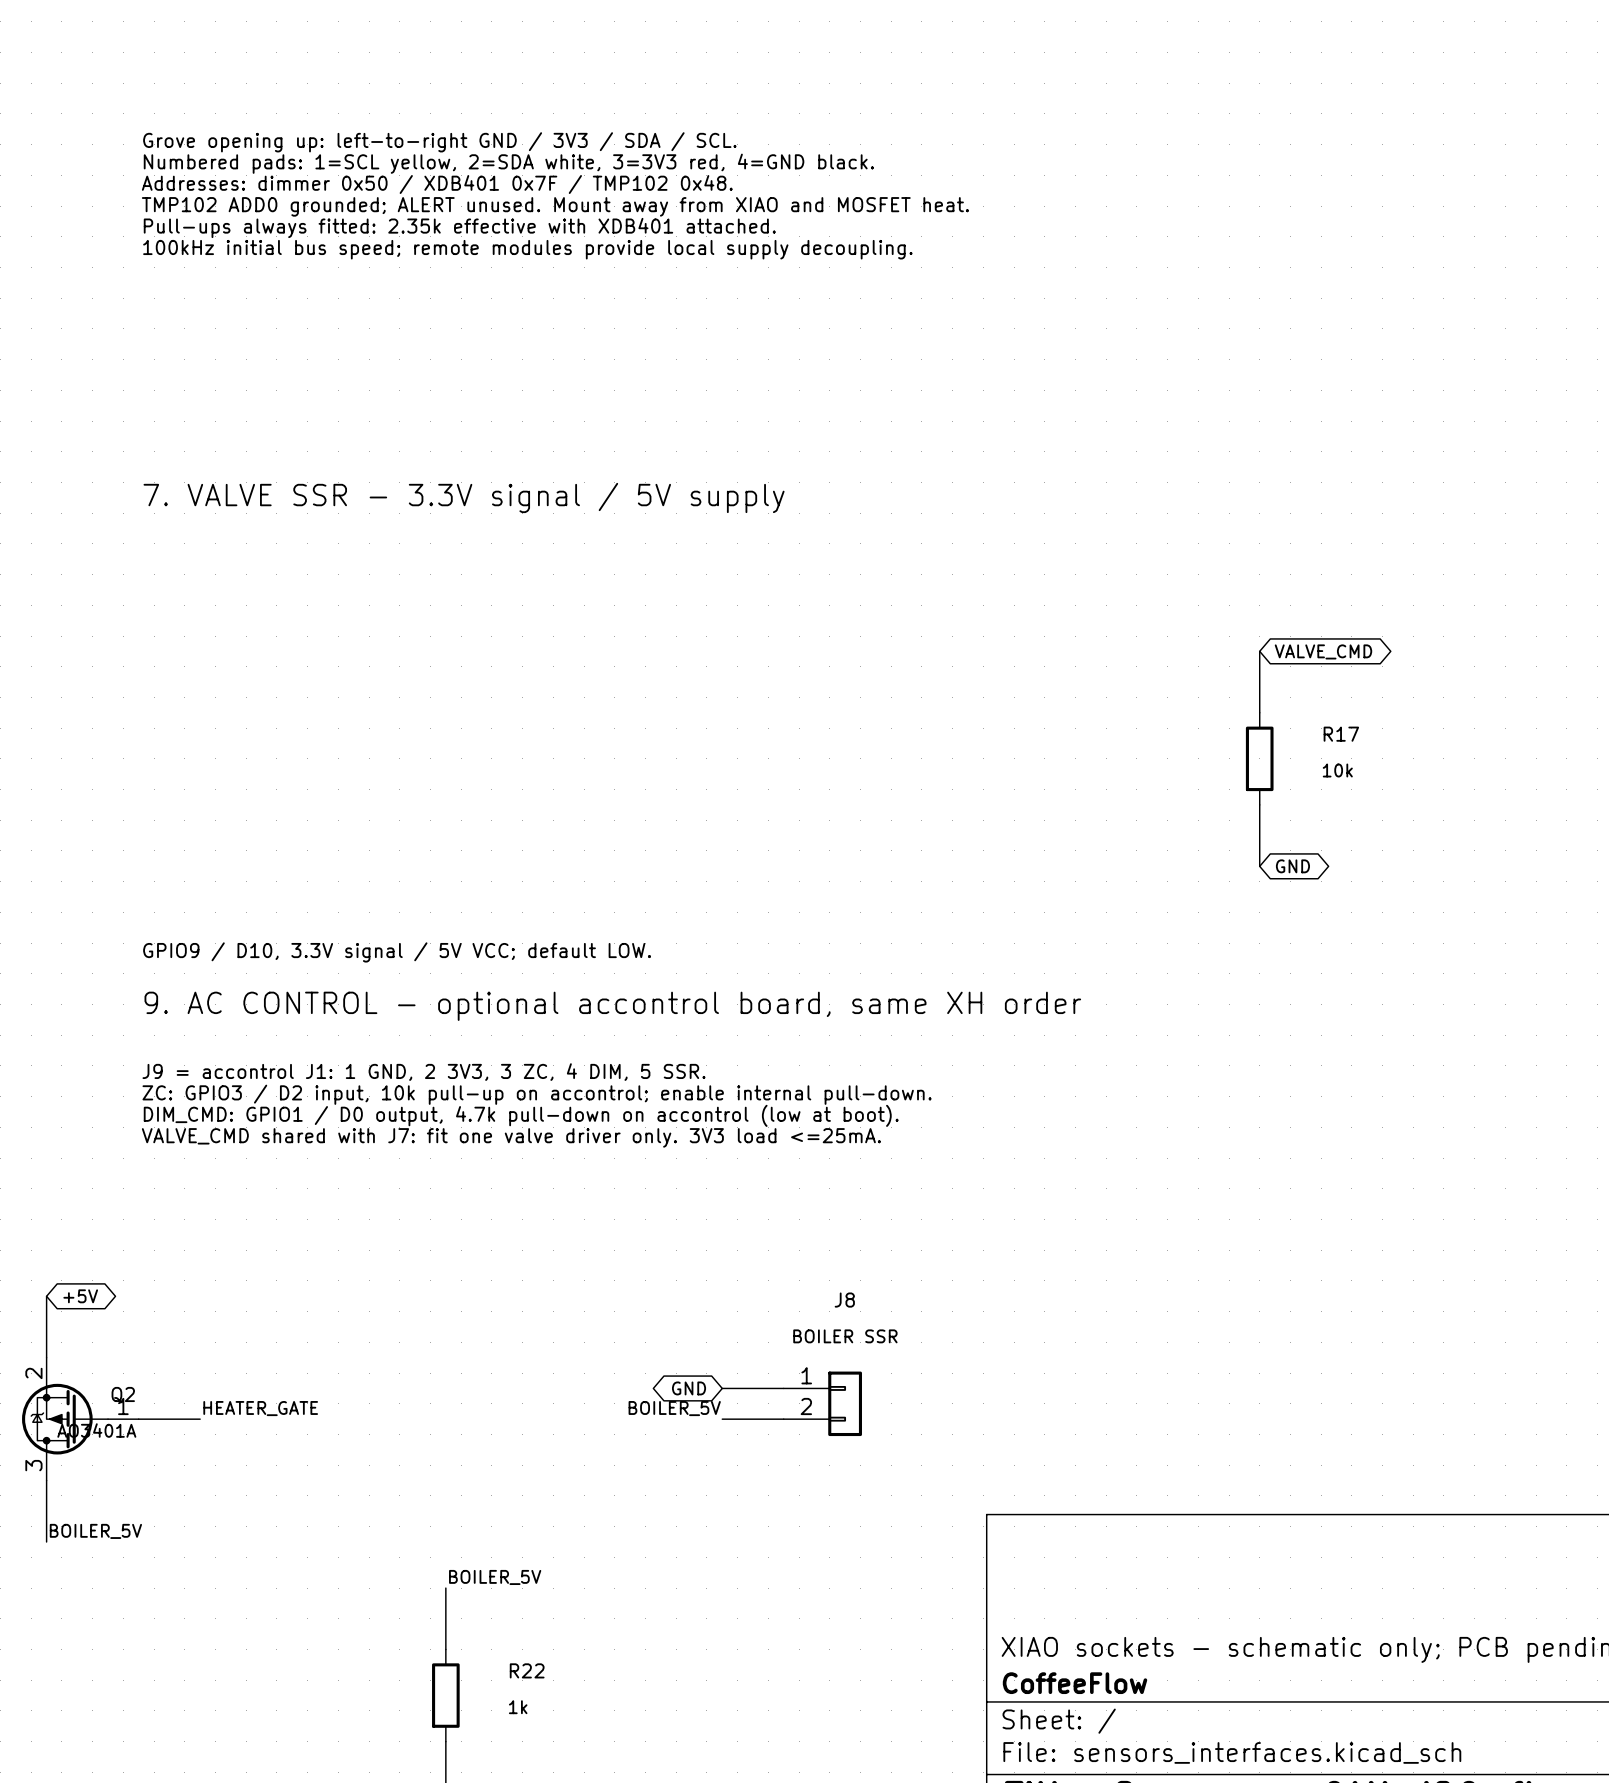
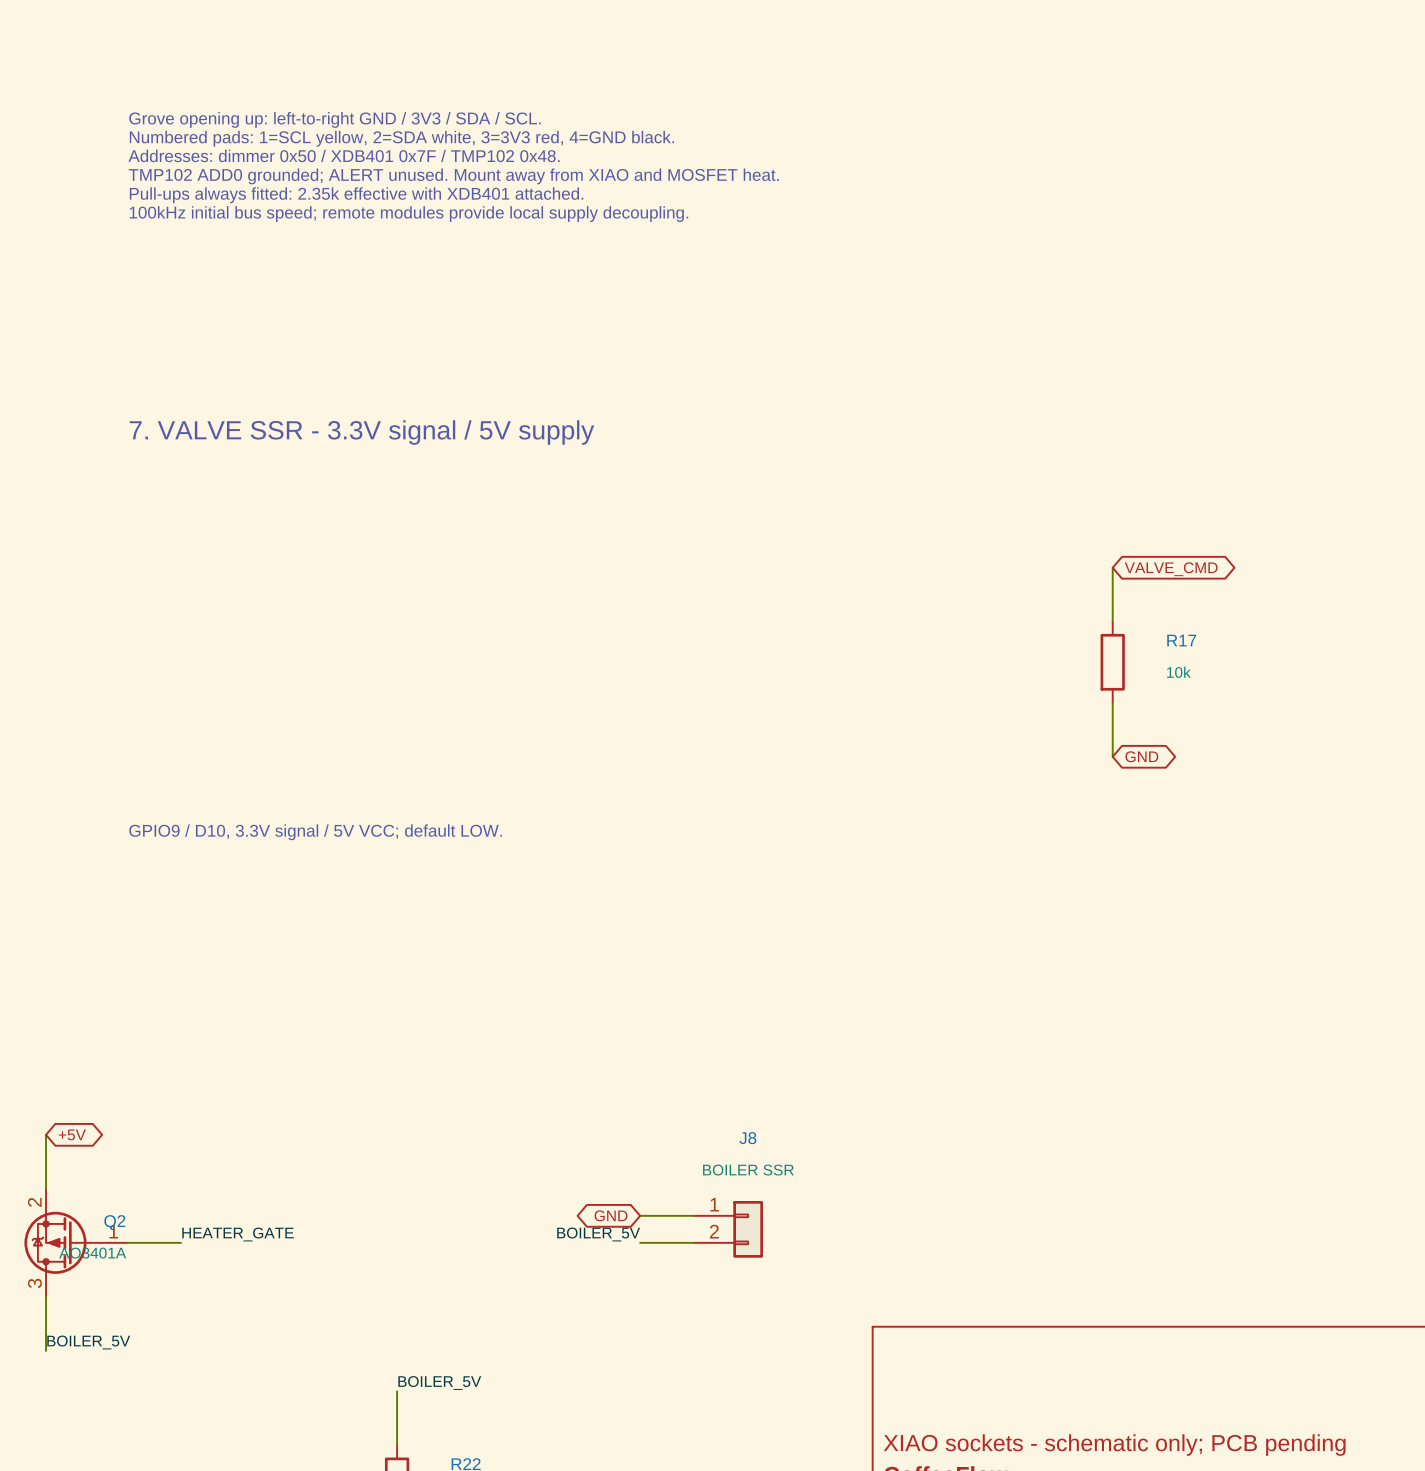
text: 9. AC CONTROL - optional accontrol board, same XH order (612, 1006) -> none
text: J9 = accontrol J1: 1 GND, 2 3V3, 3 ZC, 4 DIM, 5 SSR. (423, 1072) -> none
text: ZC: GPIO3 / D2 input, 10k pull-up on accontrol; enable internal pull-down. (537, 1094) -> none
text: DIM_CMD: GPIO1 / D0 output, 4.7k pull-down on accontrol (low at boot). (521, 1115) -> none
text: VALVE_CMD shared with J7: fit one valve driver only. 3V3 load <=25mA. (511, 1137) -> none

